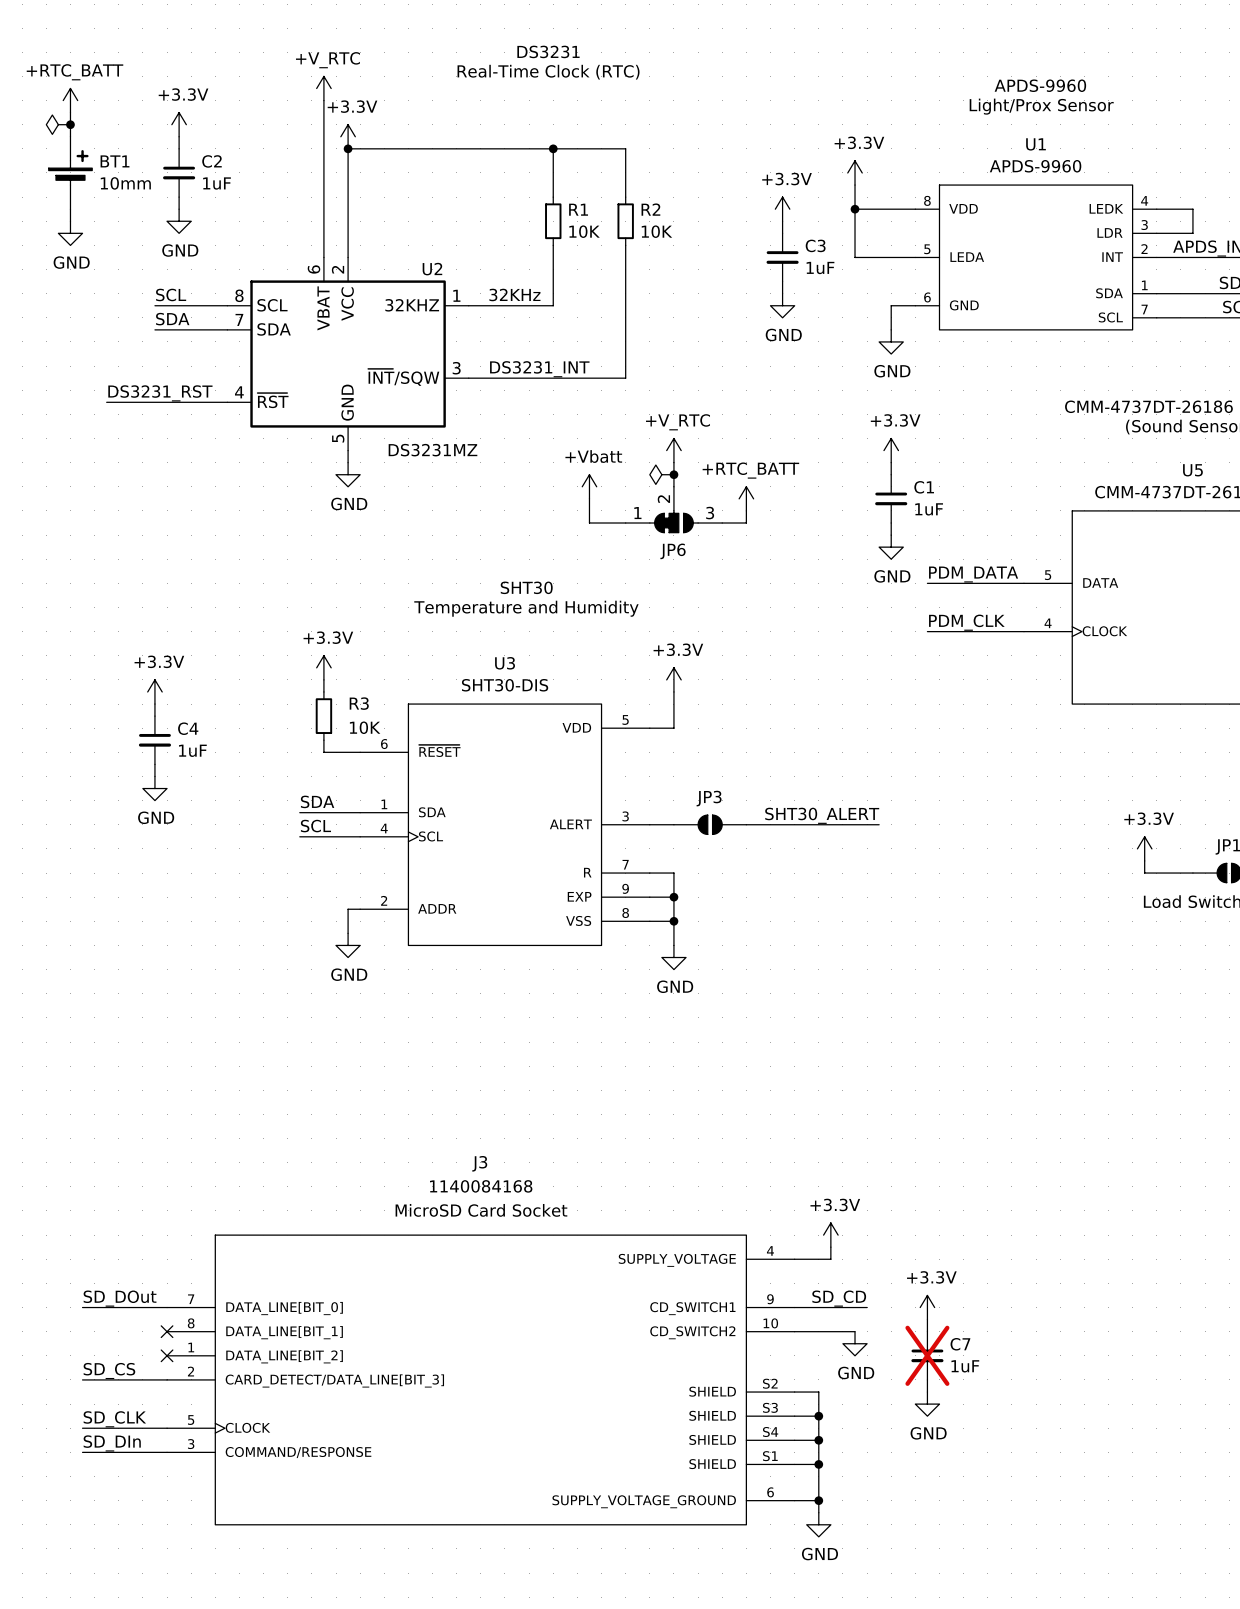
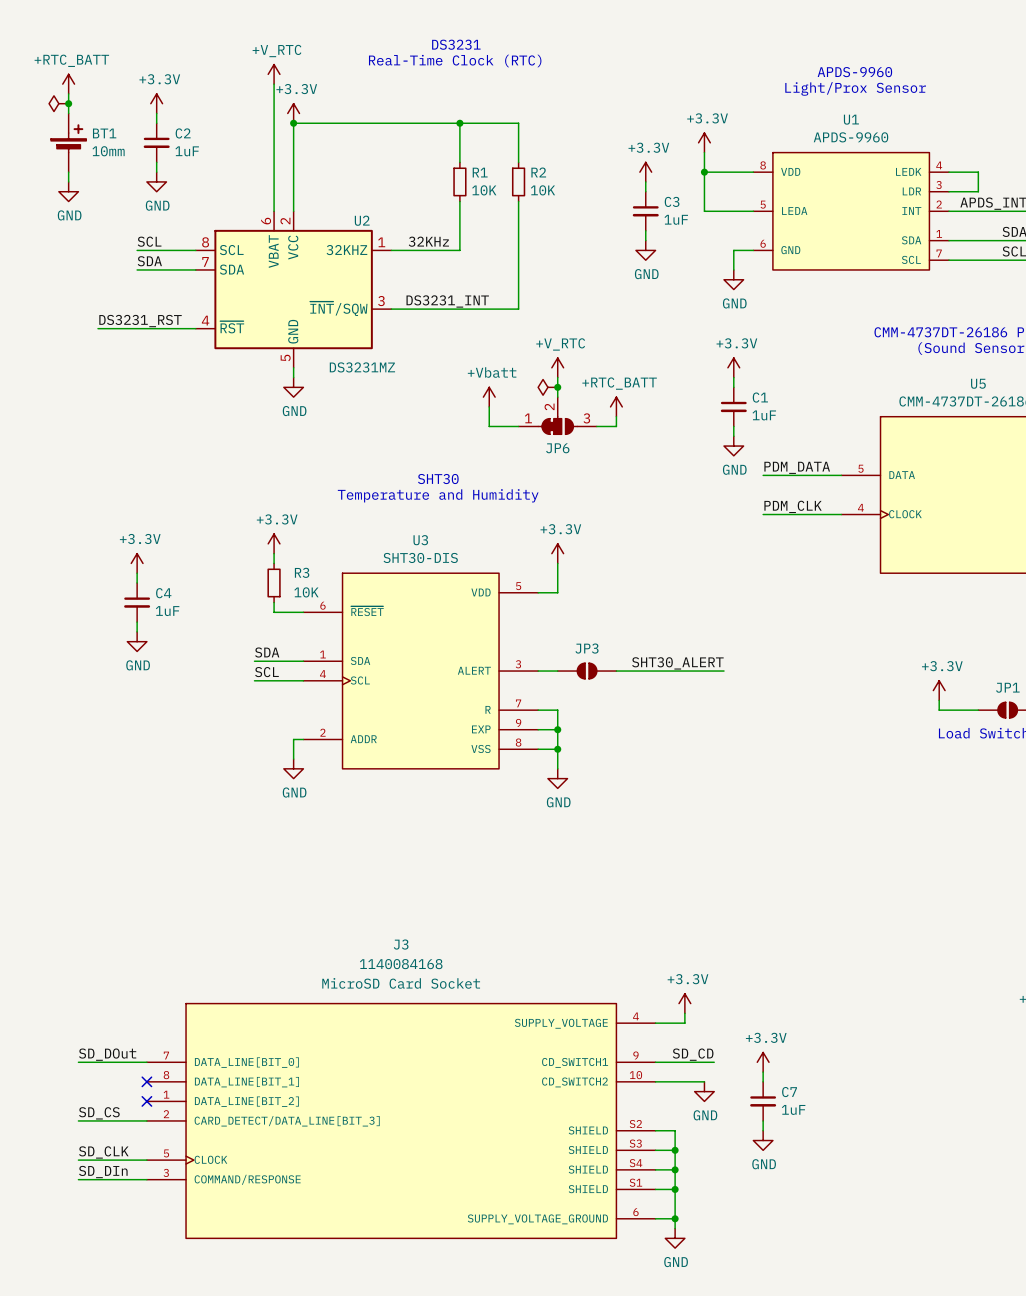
C7 do-not-place cross: (927, 1355) -> none

